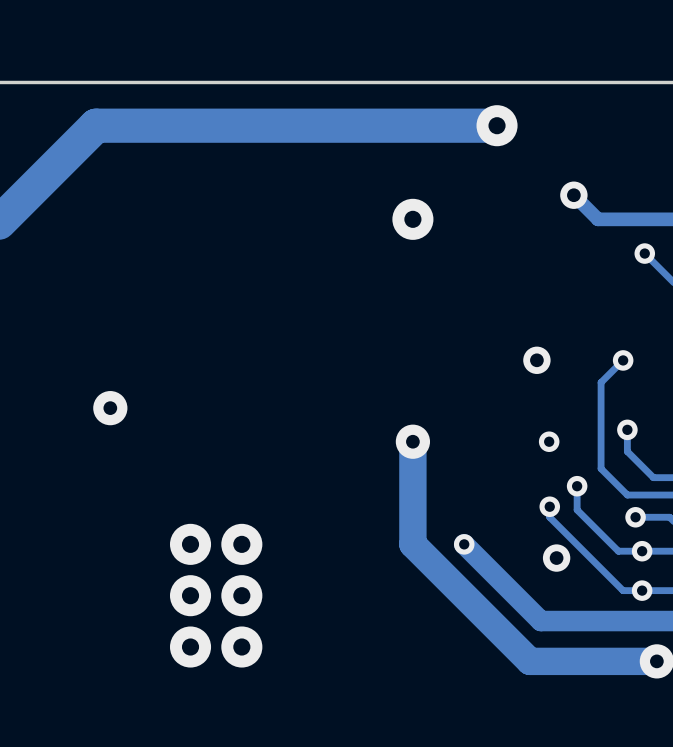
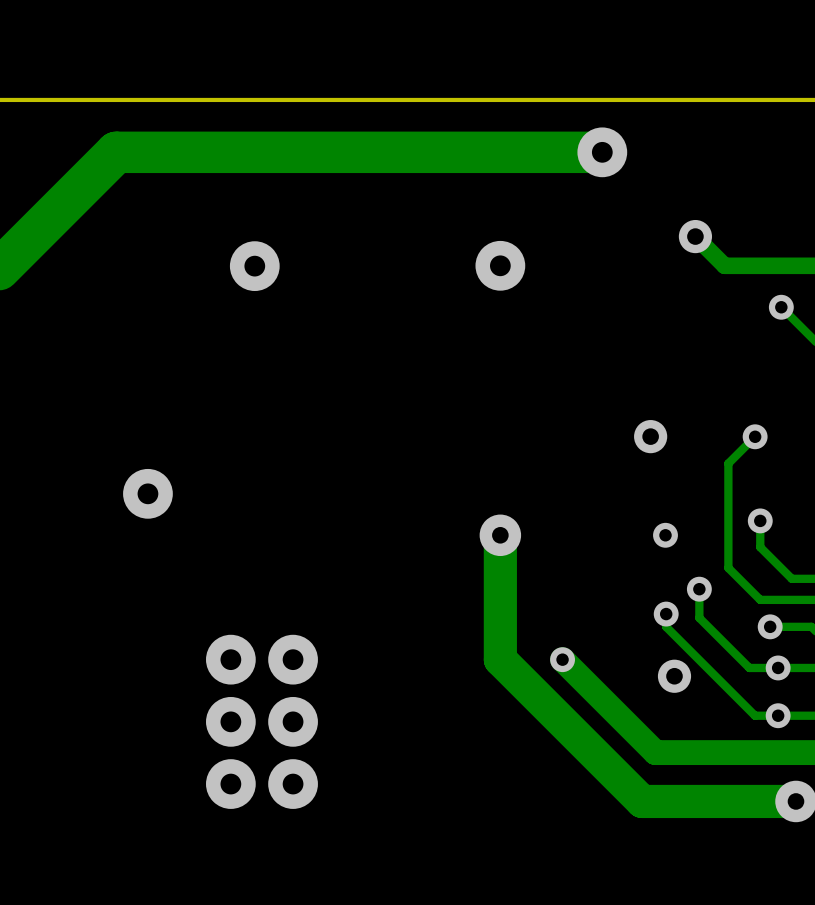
via: none -> (254, 266)
via size: [93, 391, 128, 426] -> [123, 468, 173, 519]

